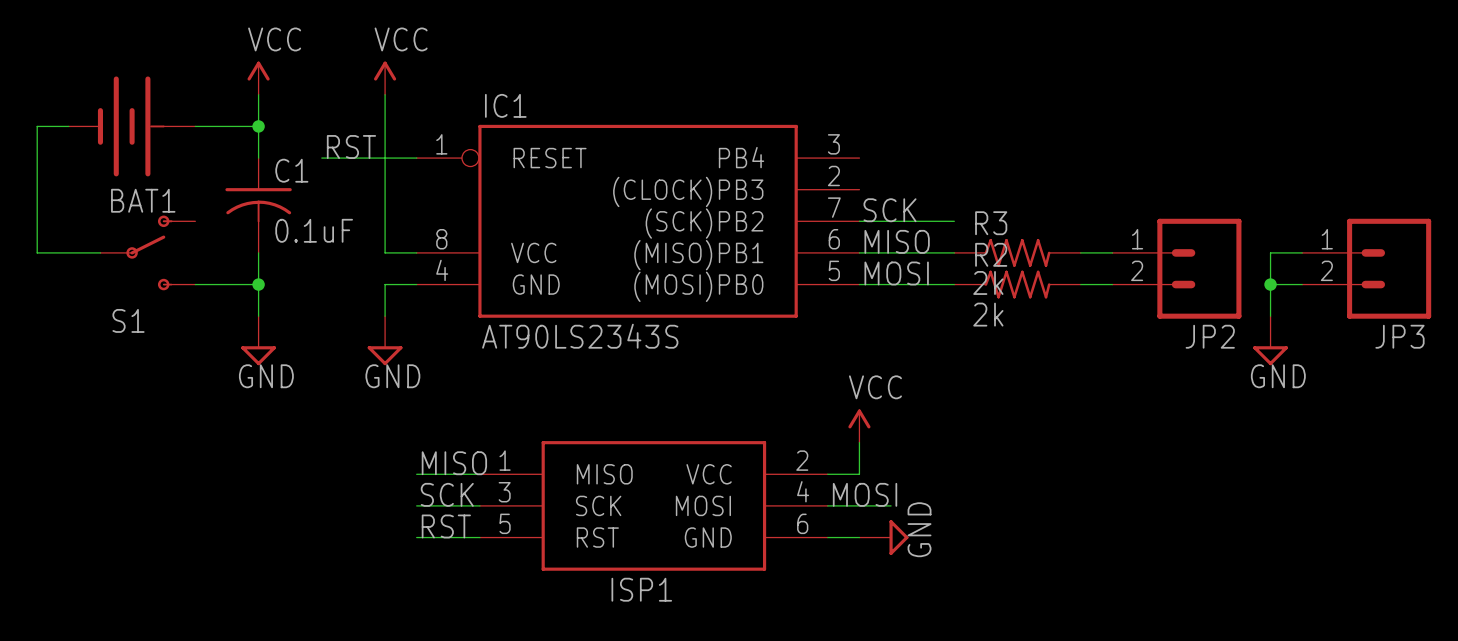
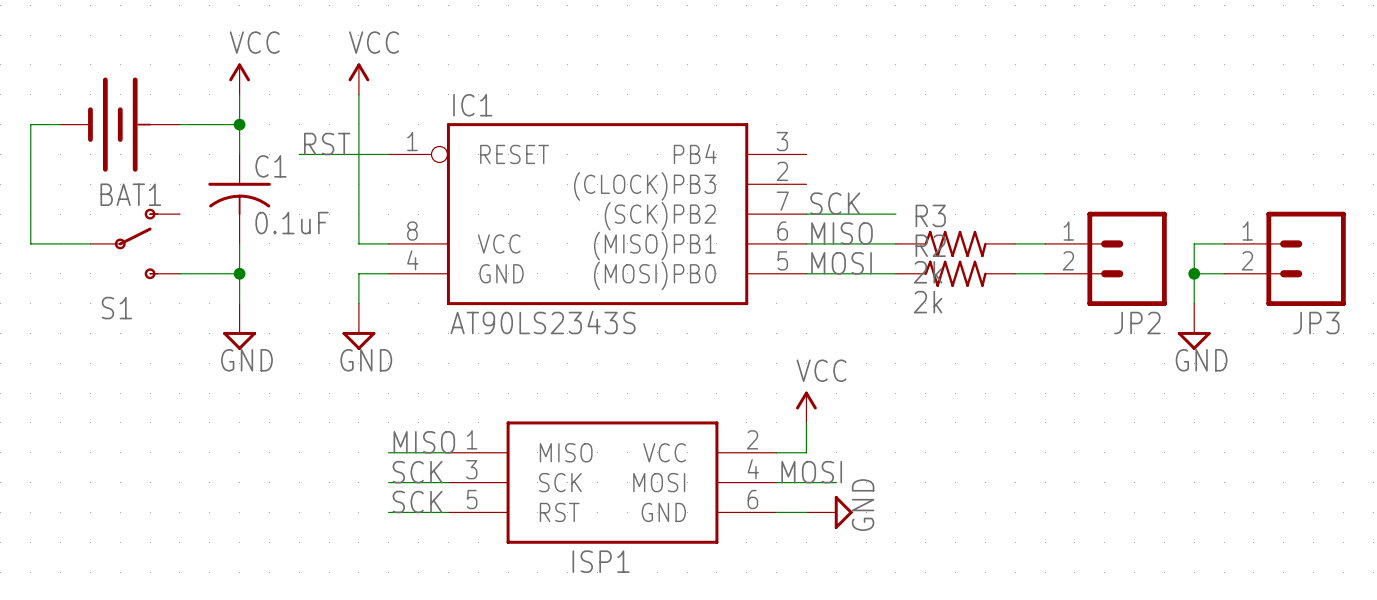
label: RST (446, 526) -> SCK (417, 501)

